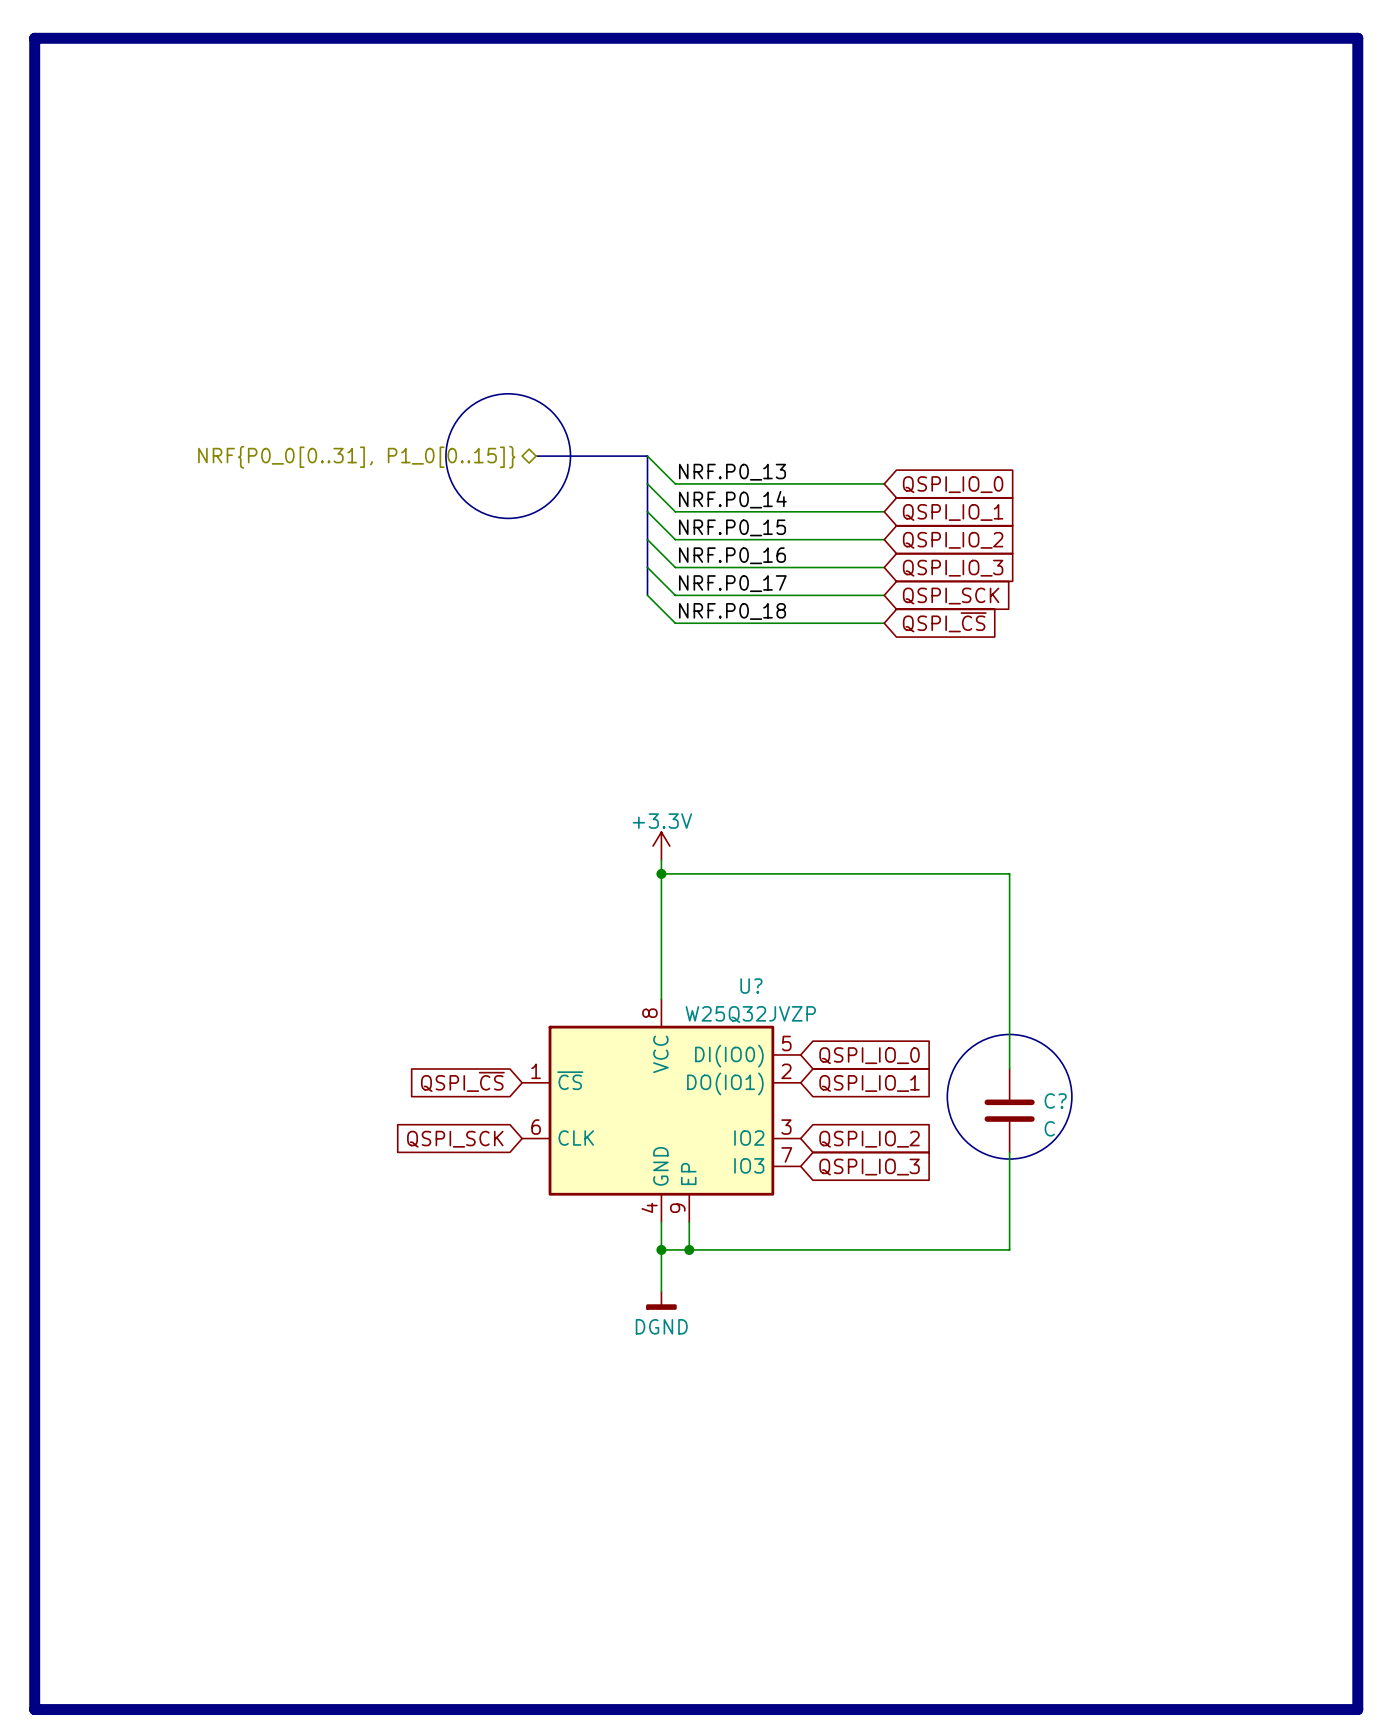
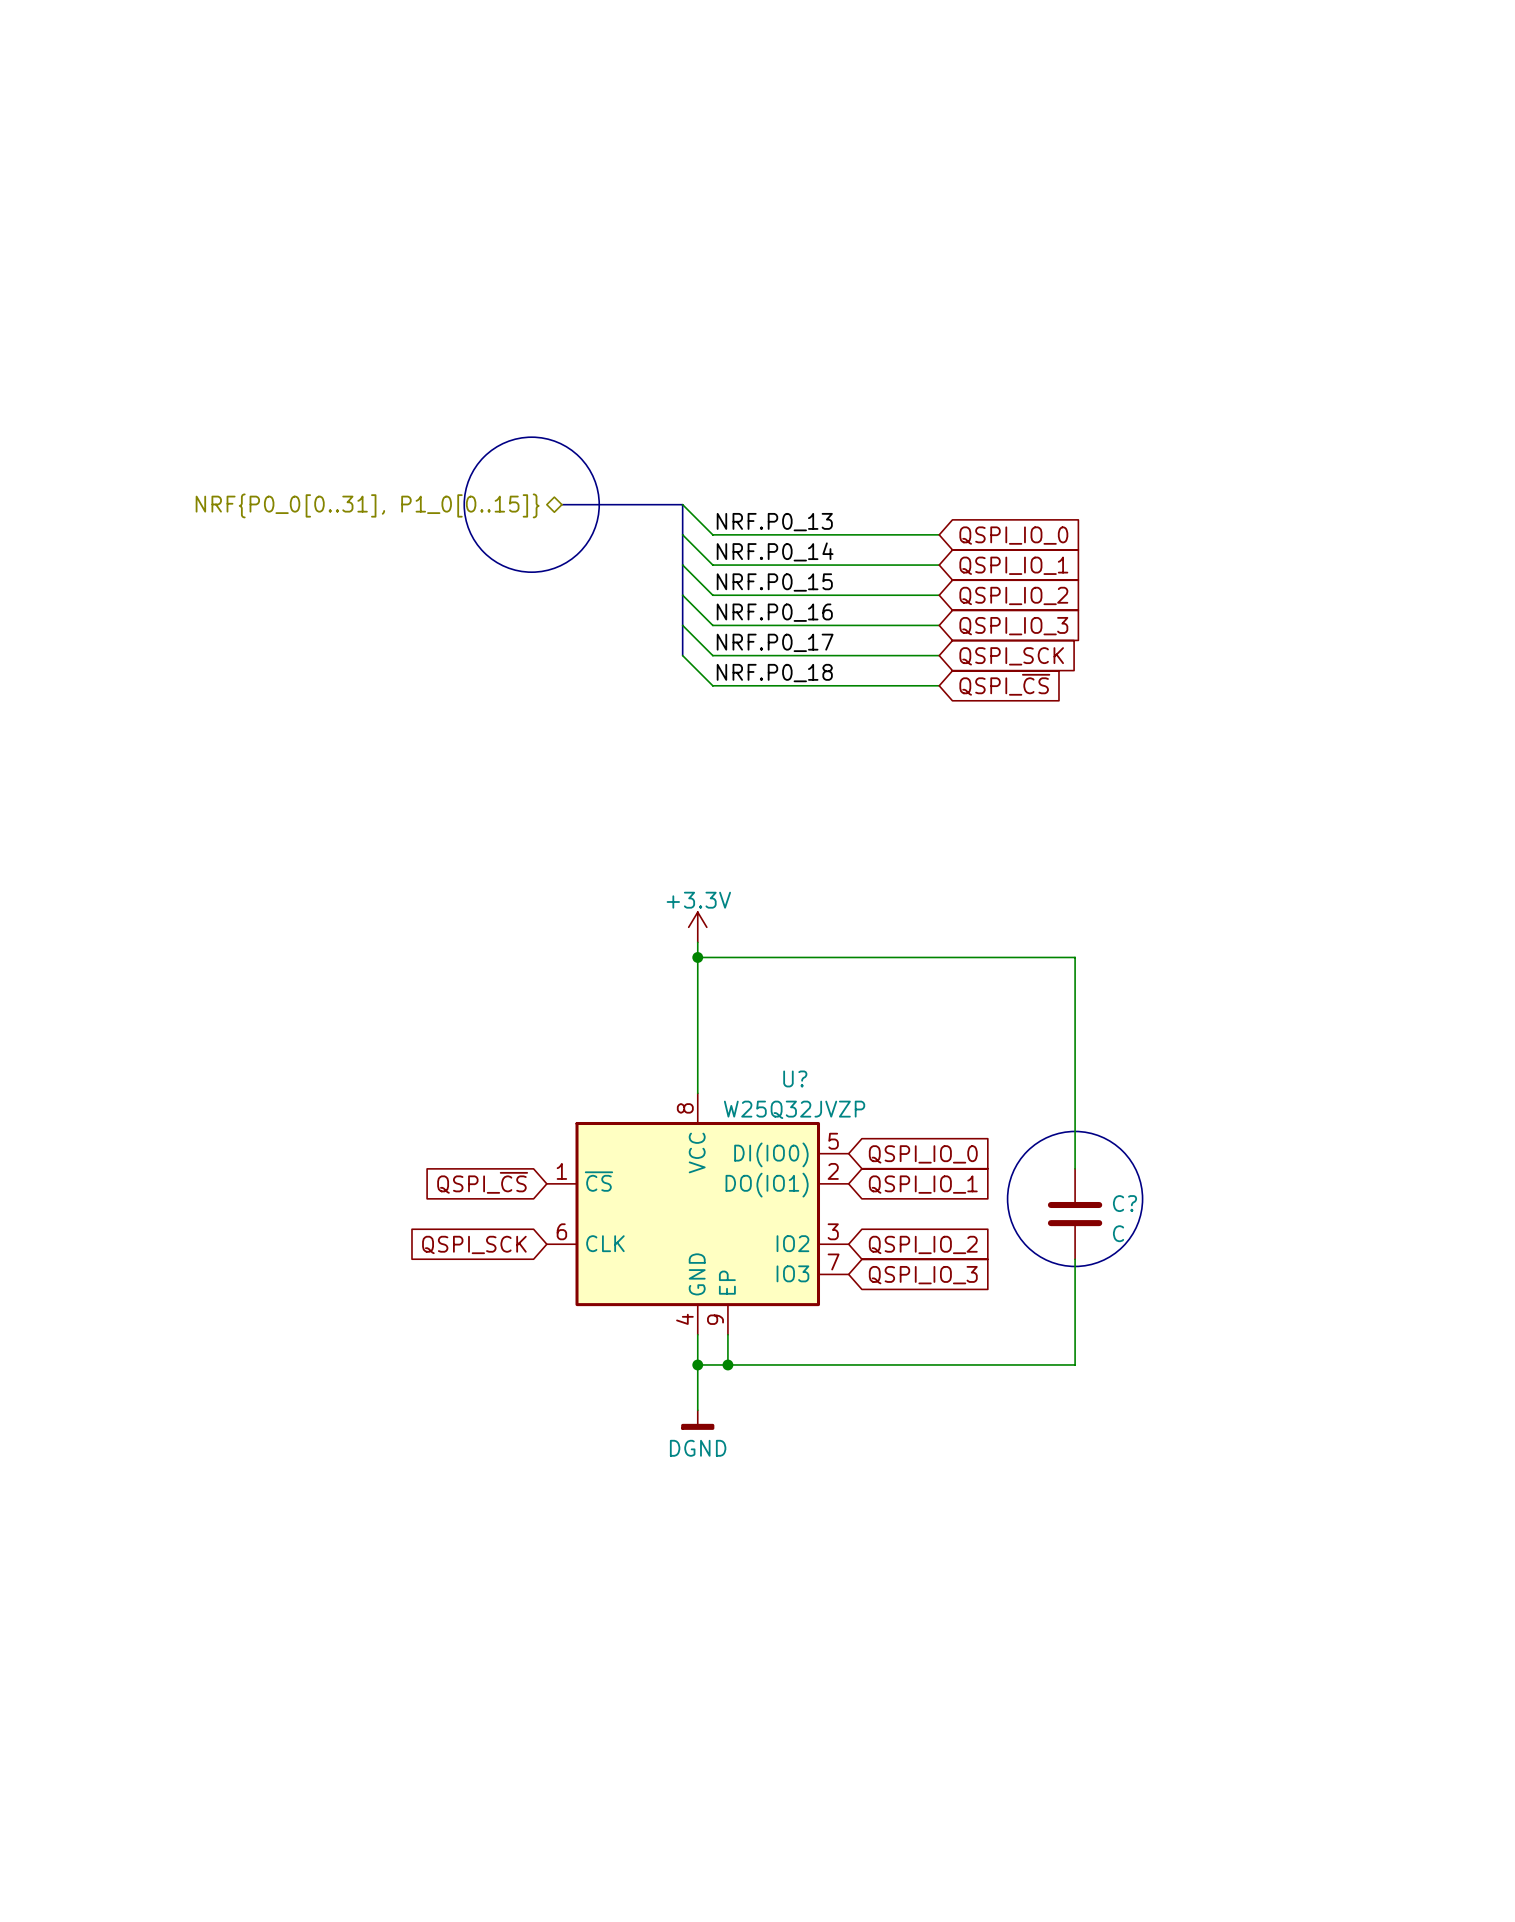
line: (34, 38) (1357, 38) (1357, 1709) (34, 1709) (34, 38) -> none

